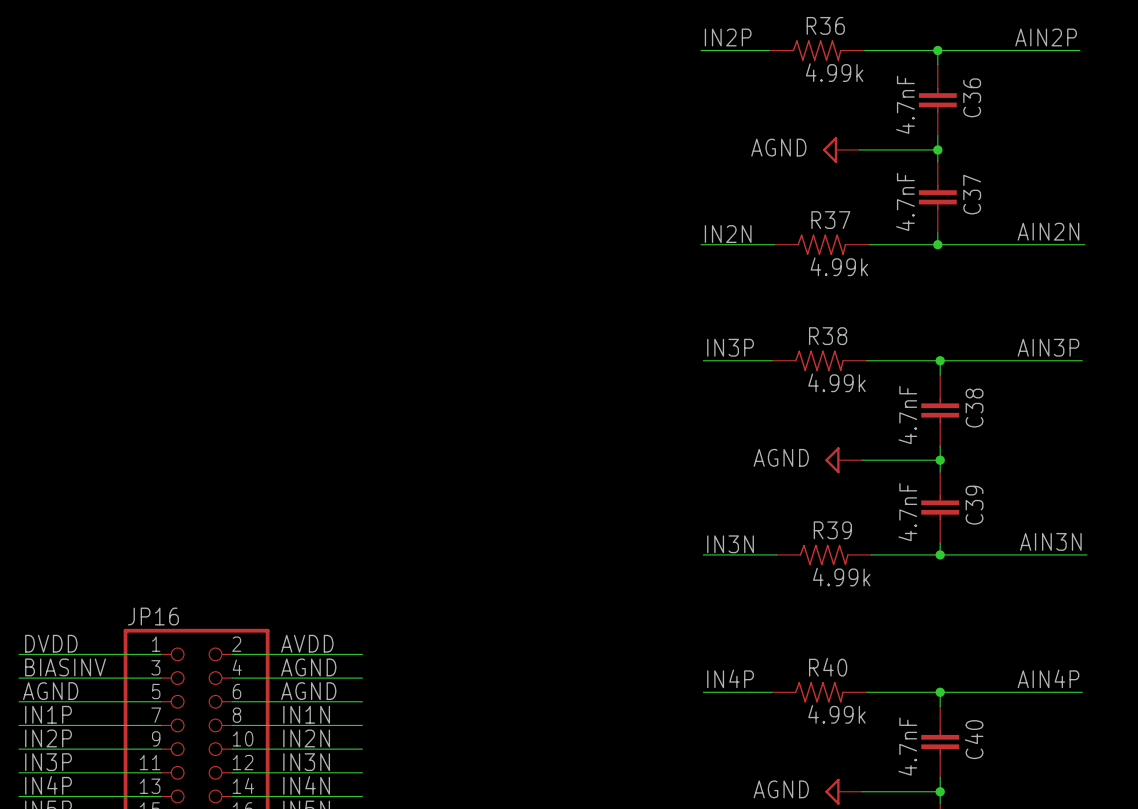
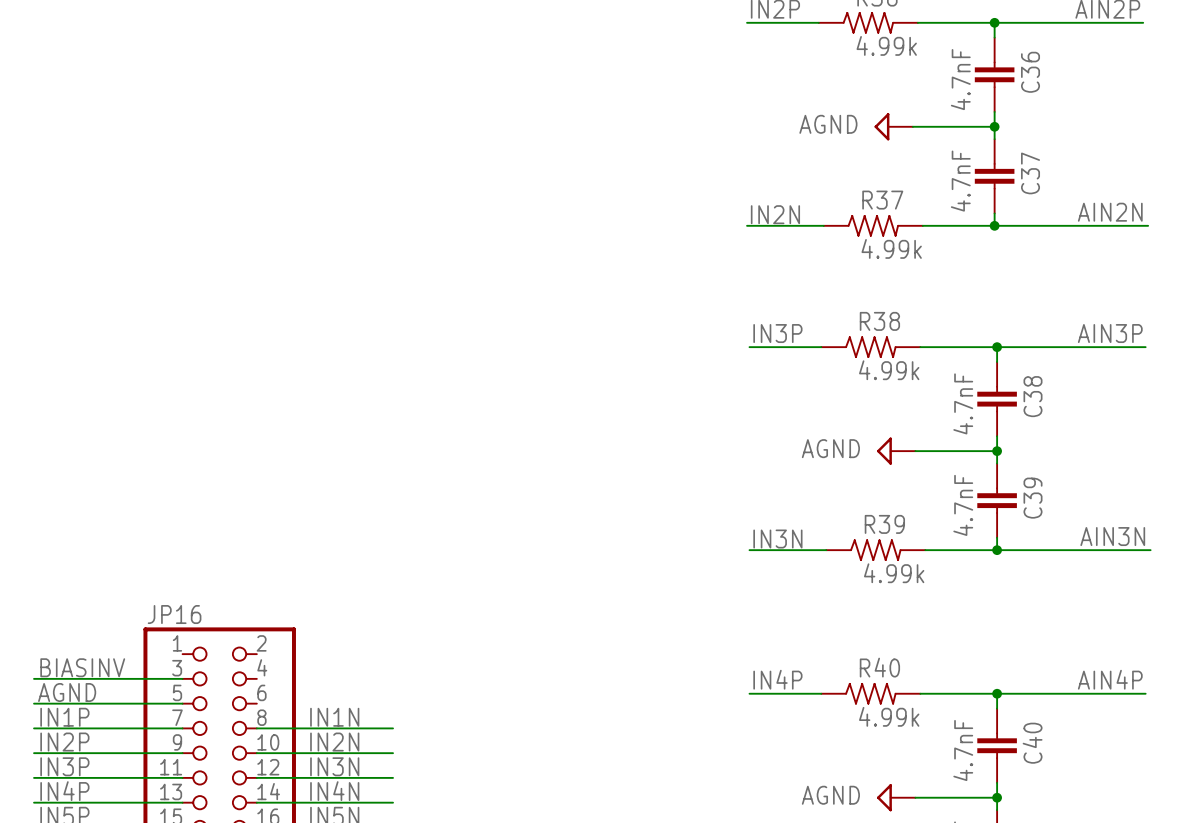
label: DVDD (51, 643) -> none
label: AVDD (307, 643) -> none
wire: (18, 654) (161, 654) -> none
wire: (232, 654) (362, 654) -> none
label: AGND (308, 667) -> none
wire: (232, 678) (362, 678) -> none
label: AGND (308, 691) -> none
wire: (232, 701) (362, 701) -> none

